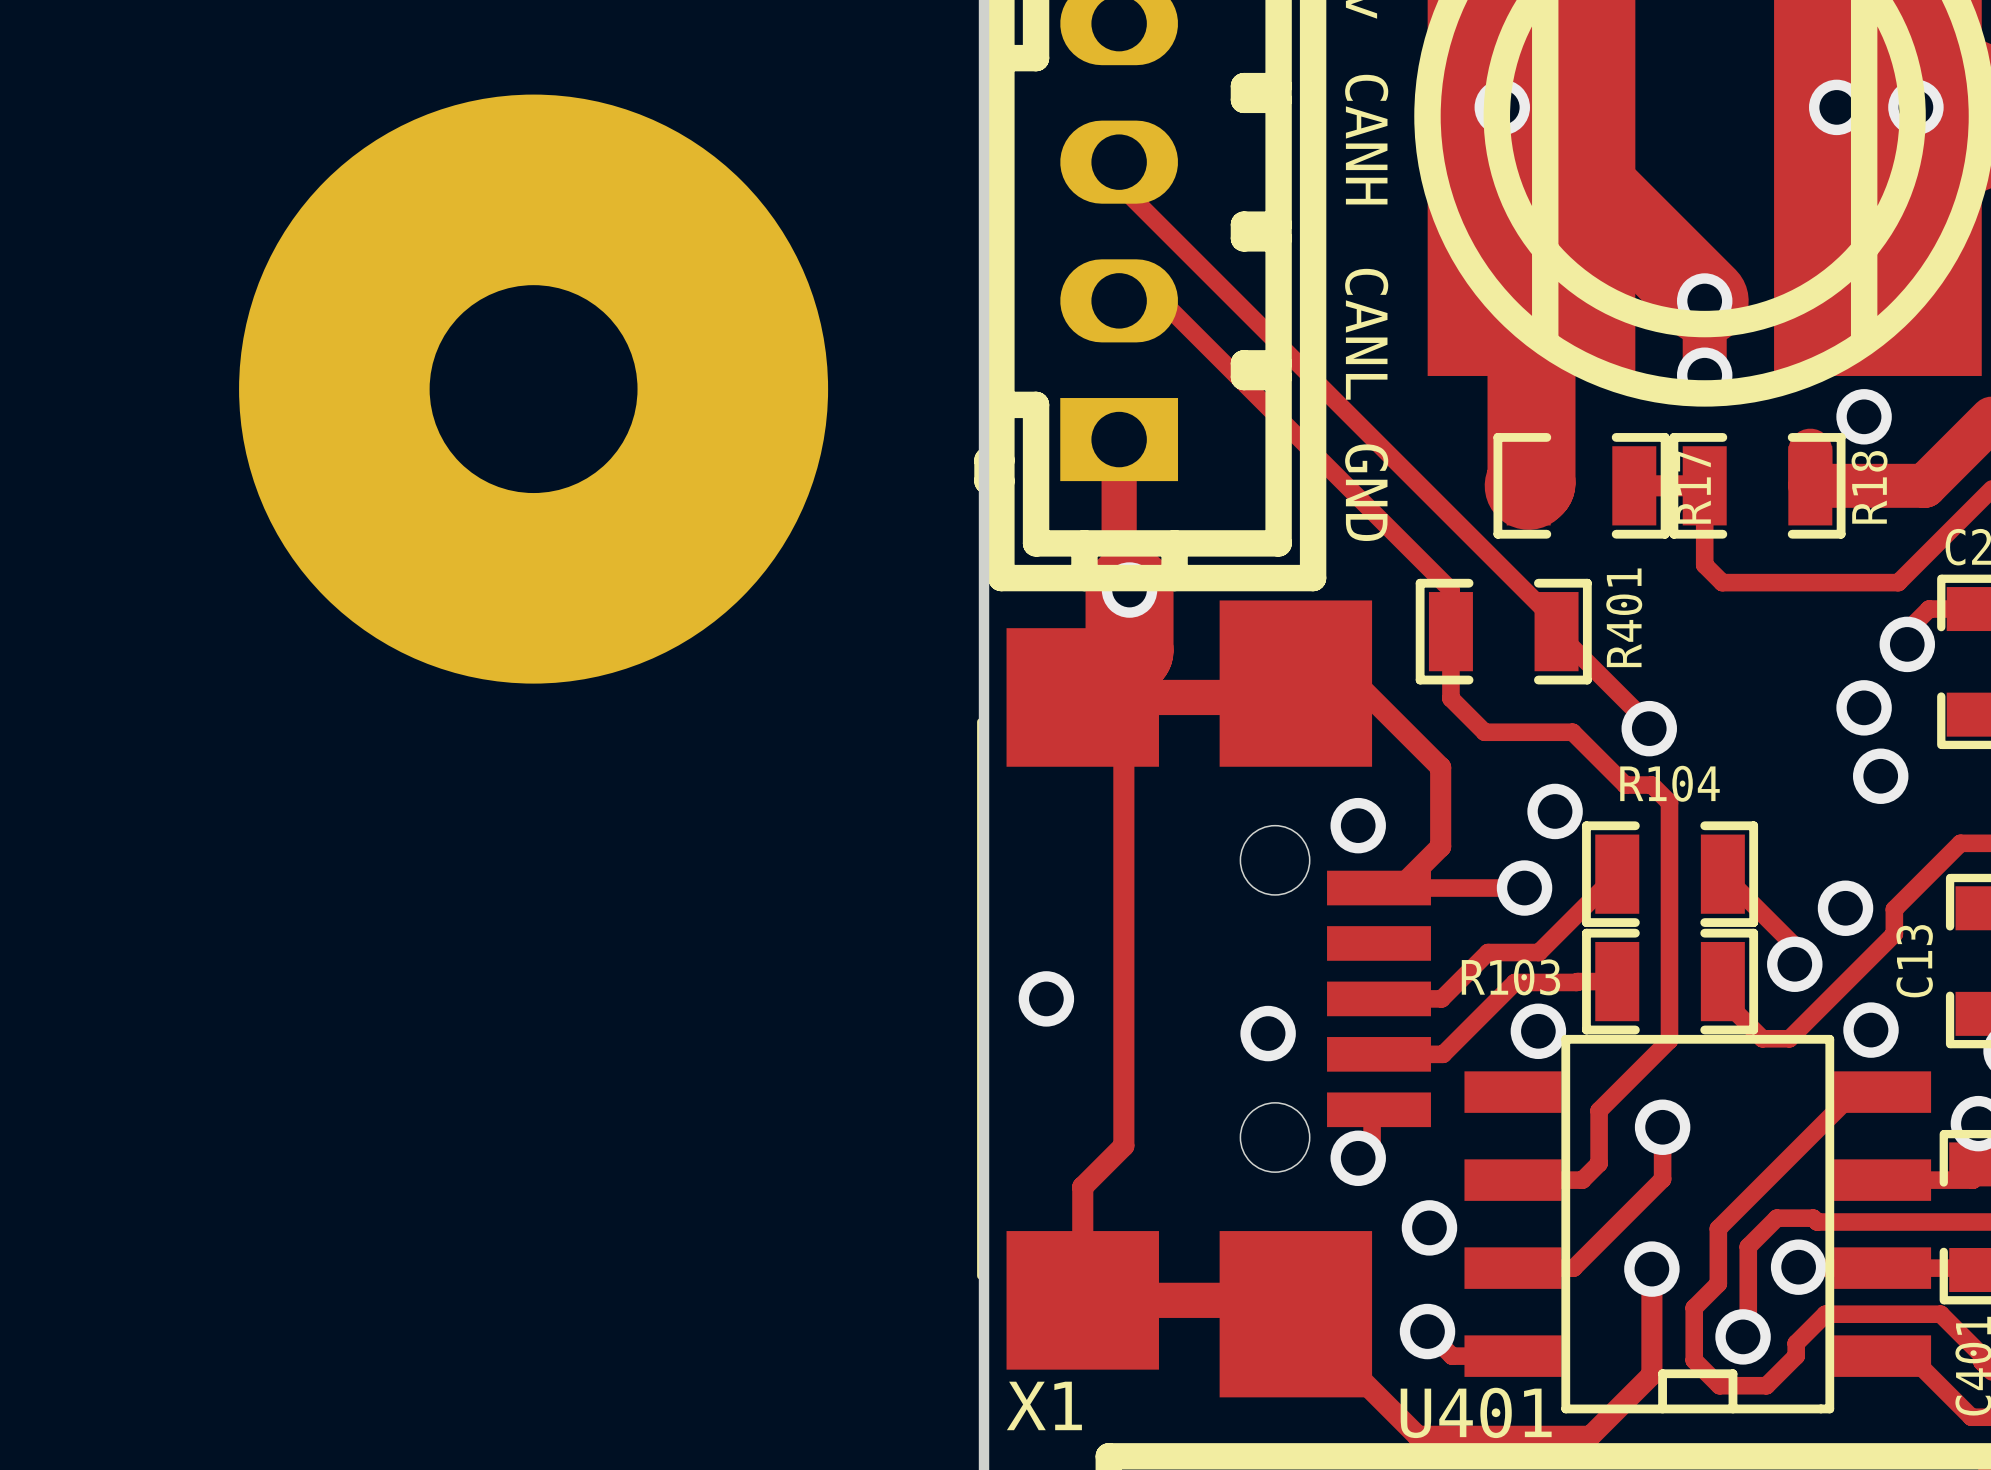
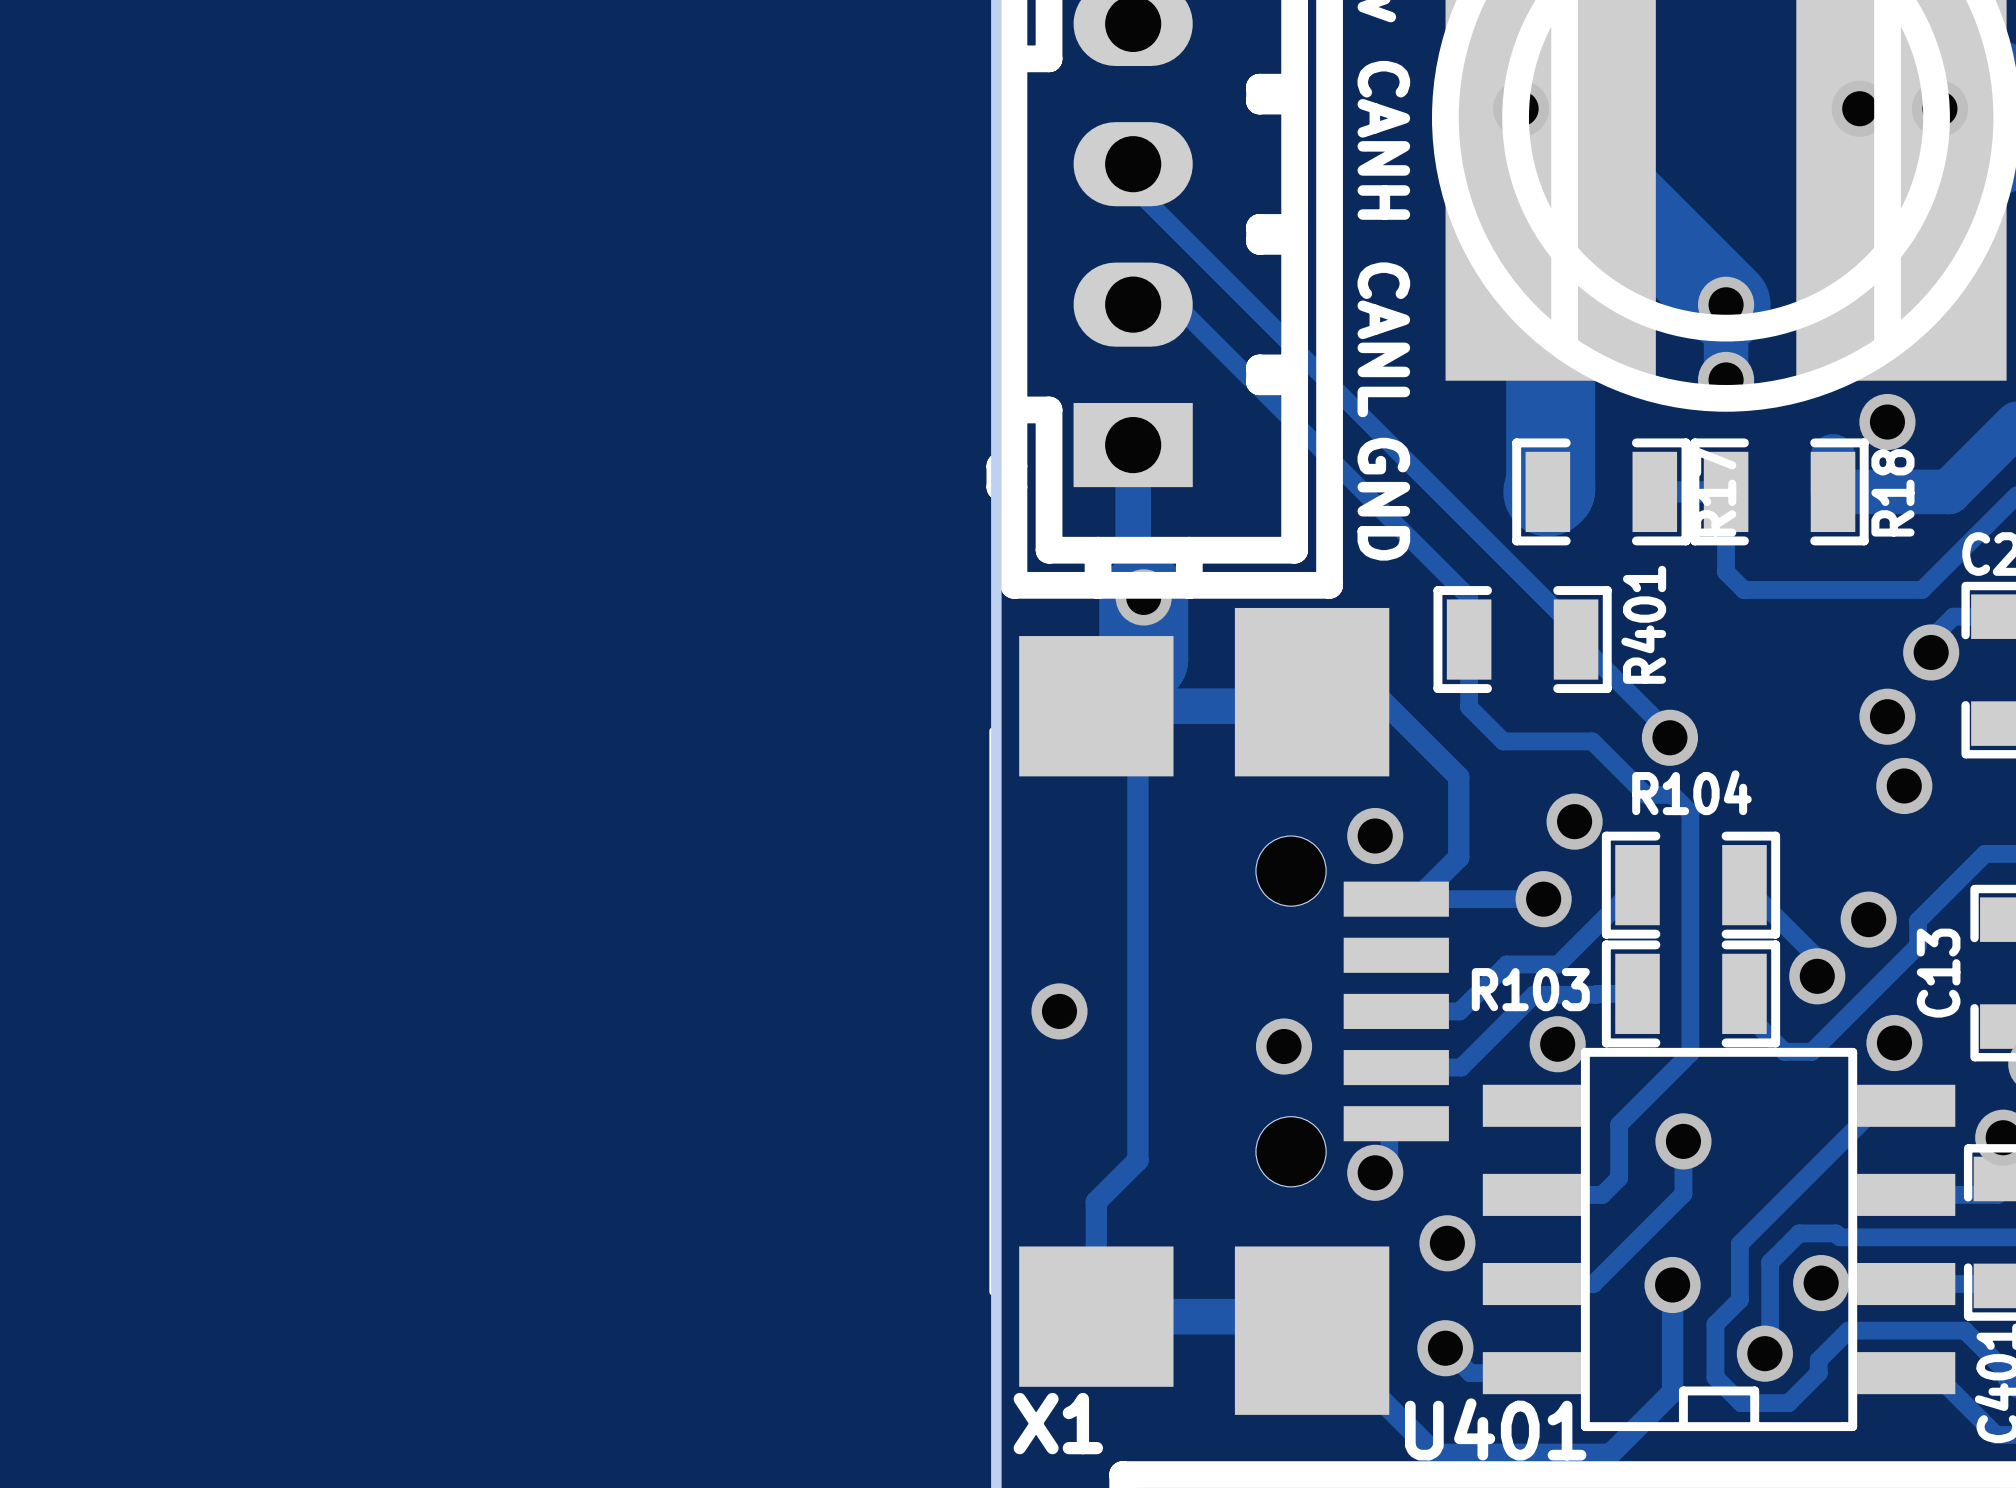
part: (533, 389) -> none

